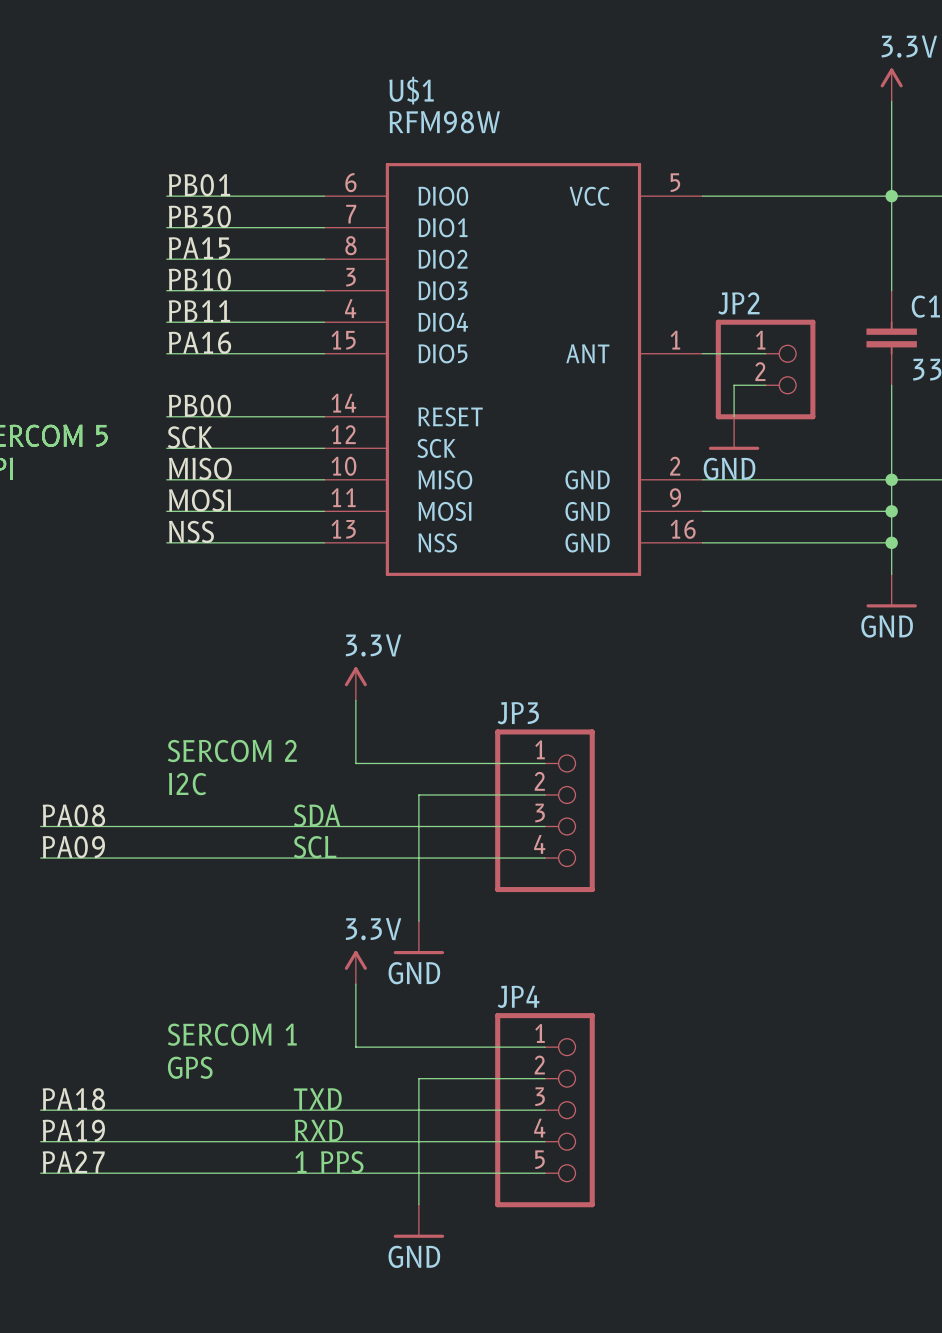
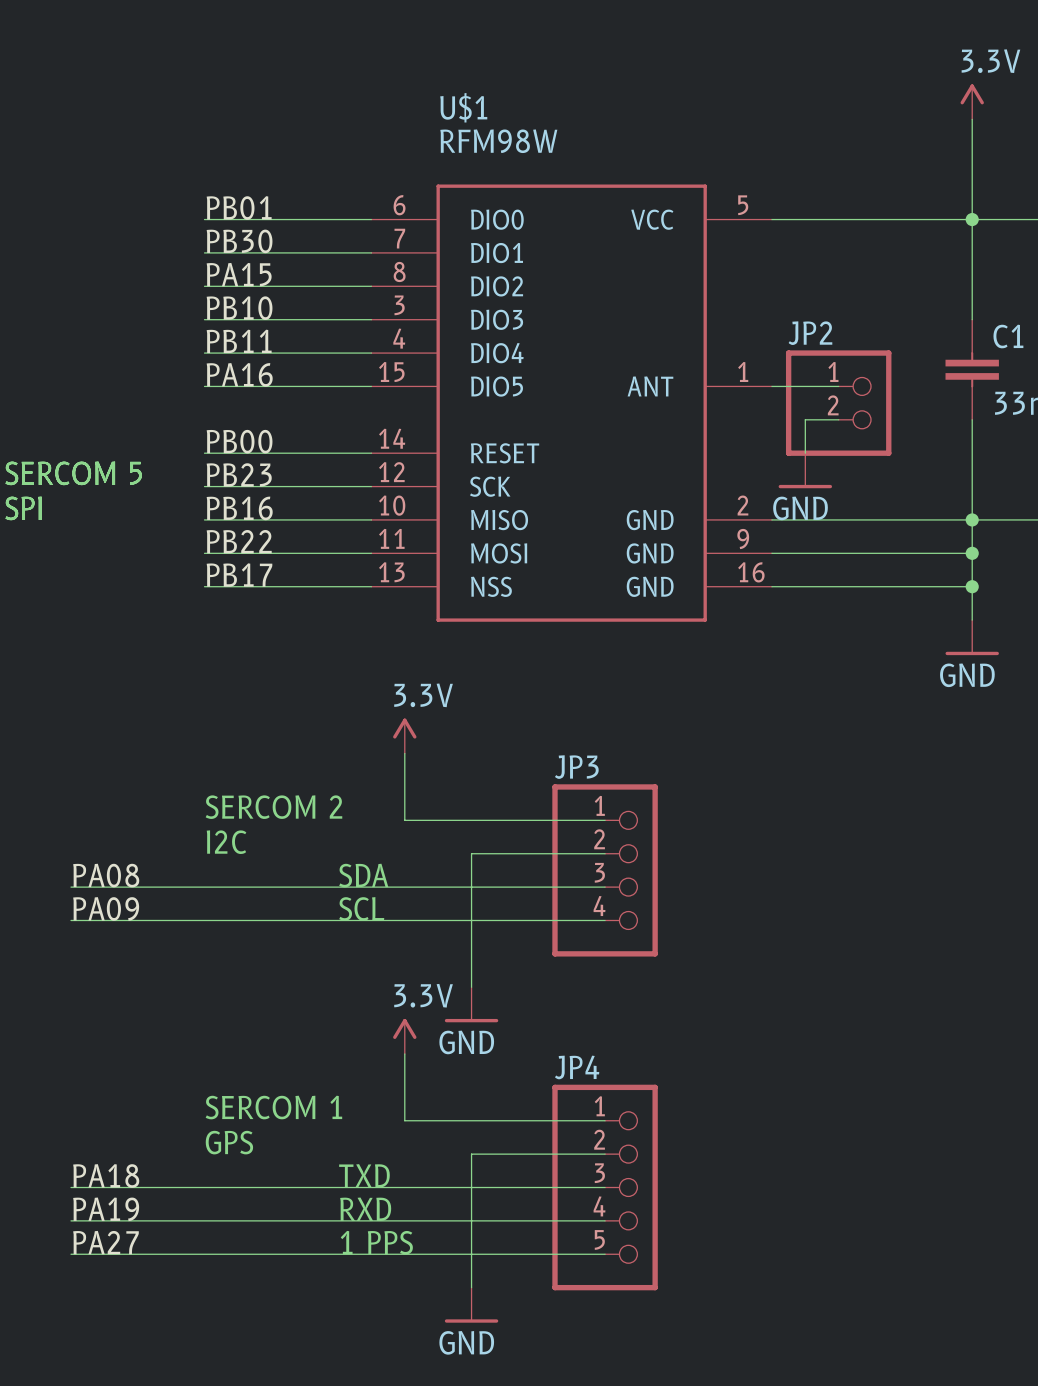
label: SCK (190, 437) -> PB23 (239, 474)
label: MISO (200, 468) -> PB16 (239, 508)
label: MOSI (199, 500) -> PB22 (239, 541)
label: NSS (191, 531) -> PB17 (239, 575)

